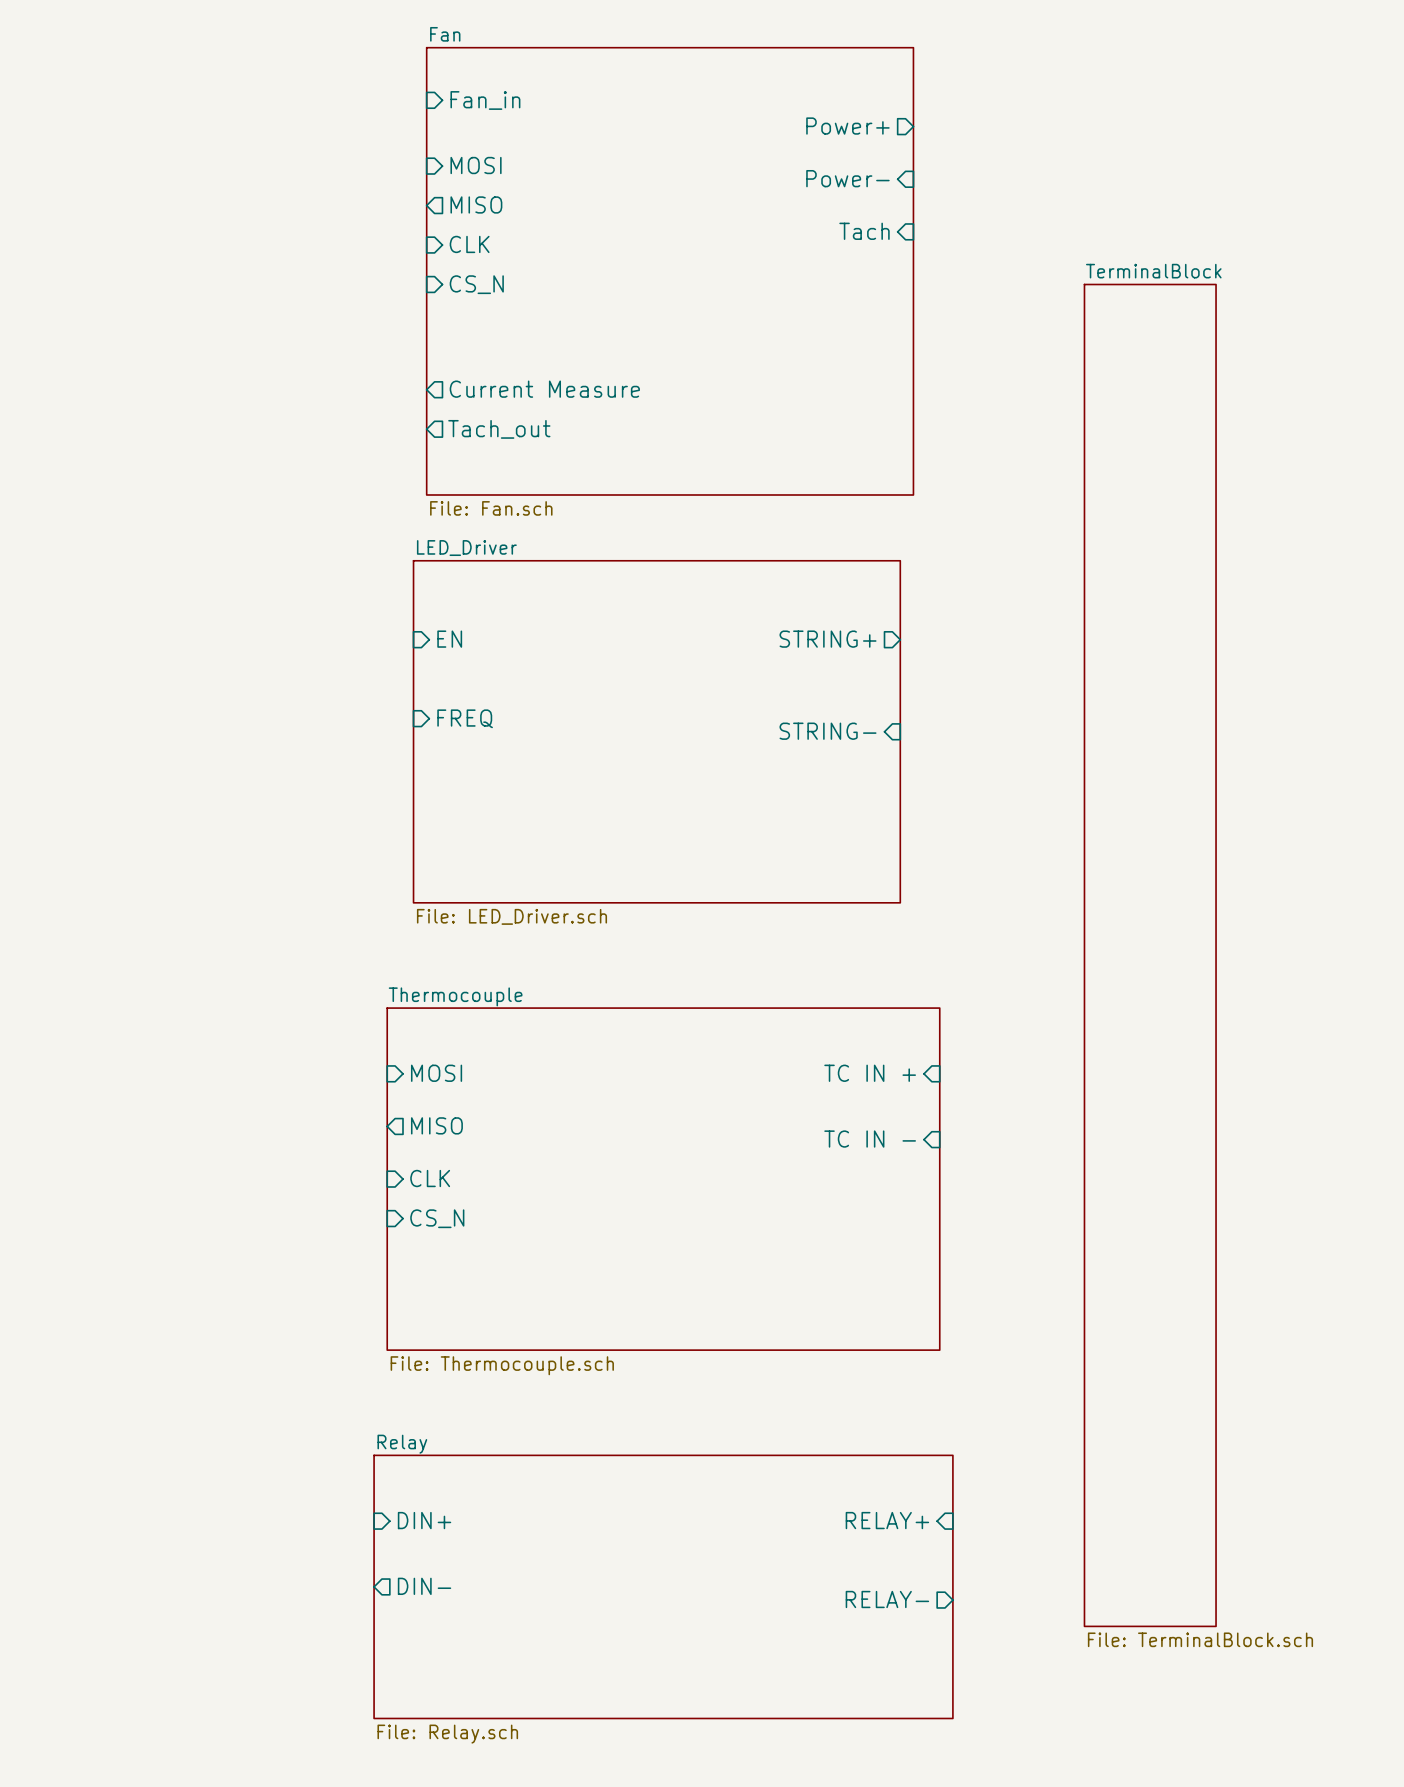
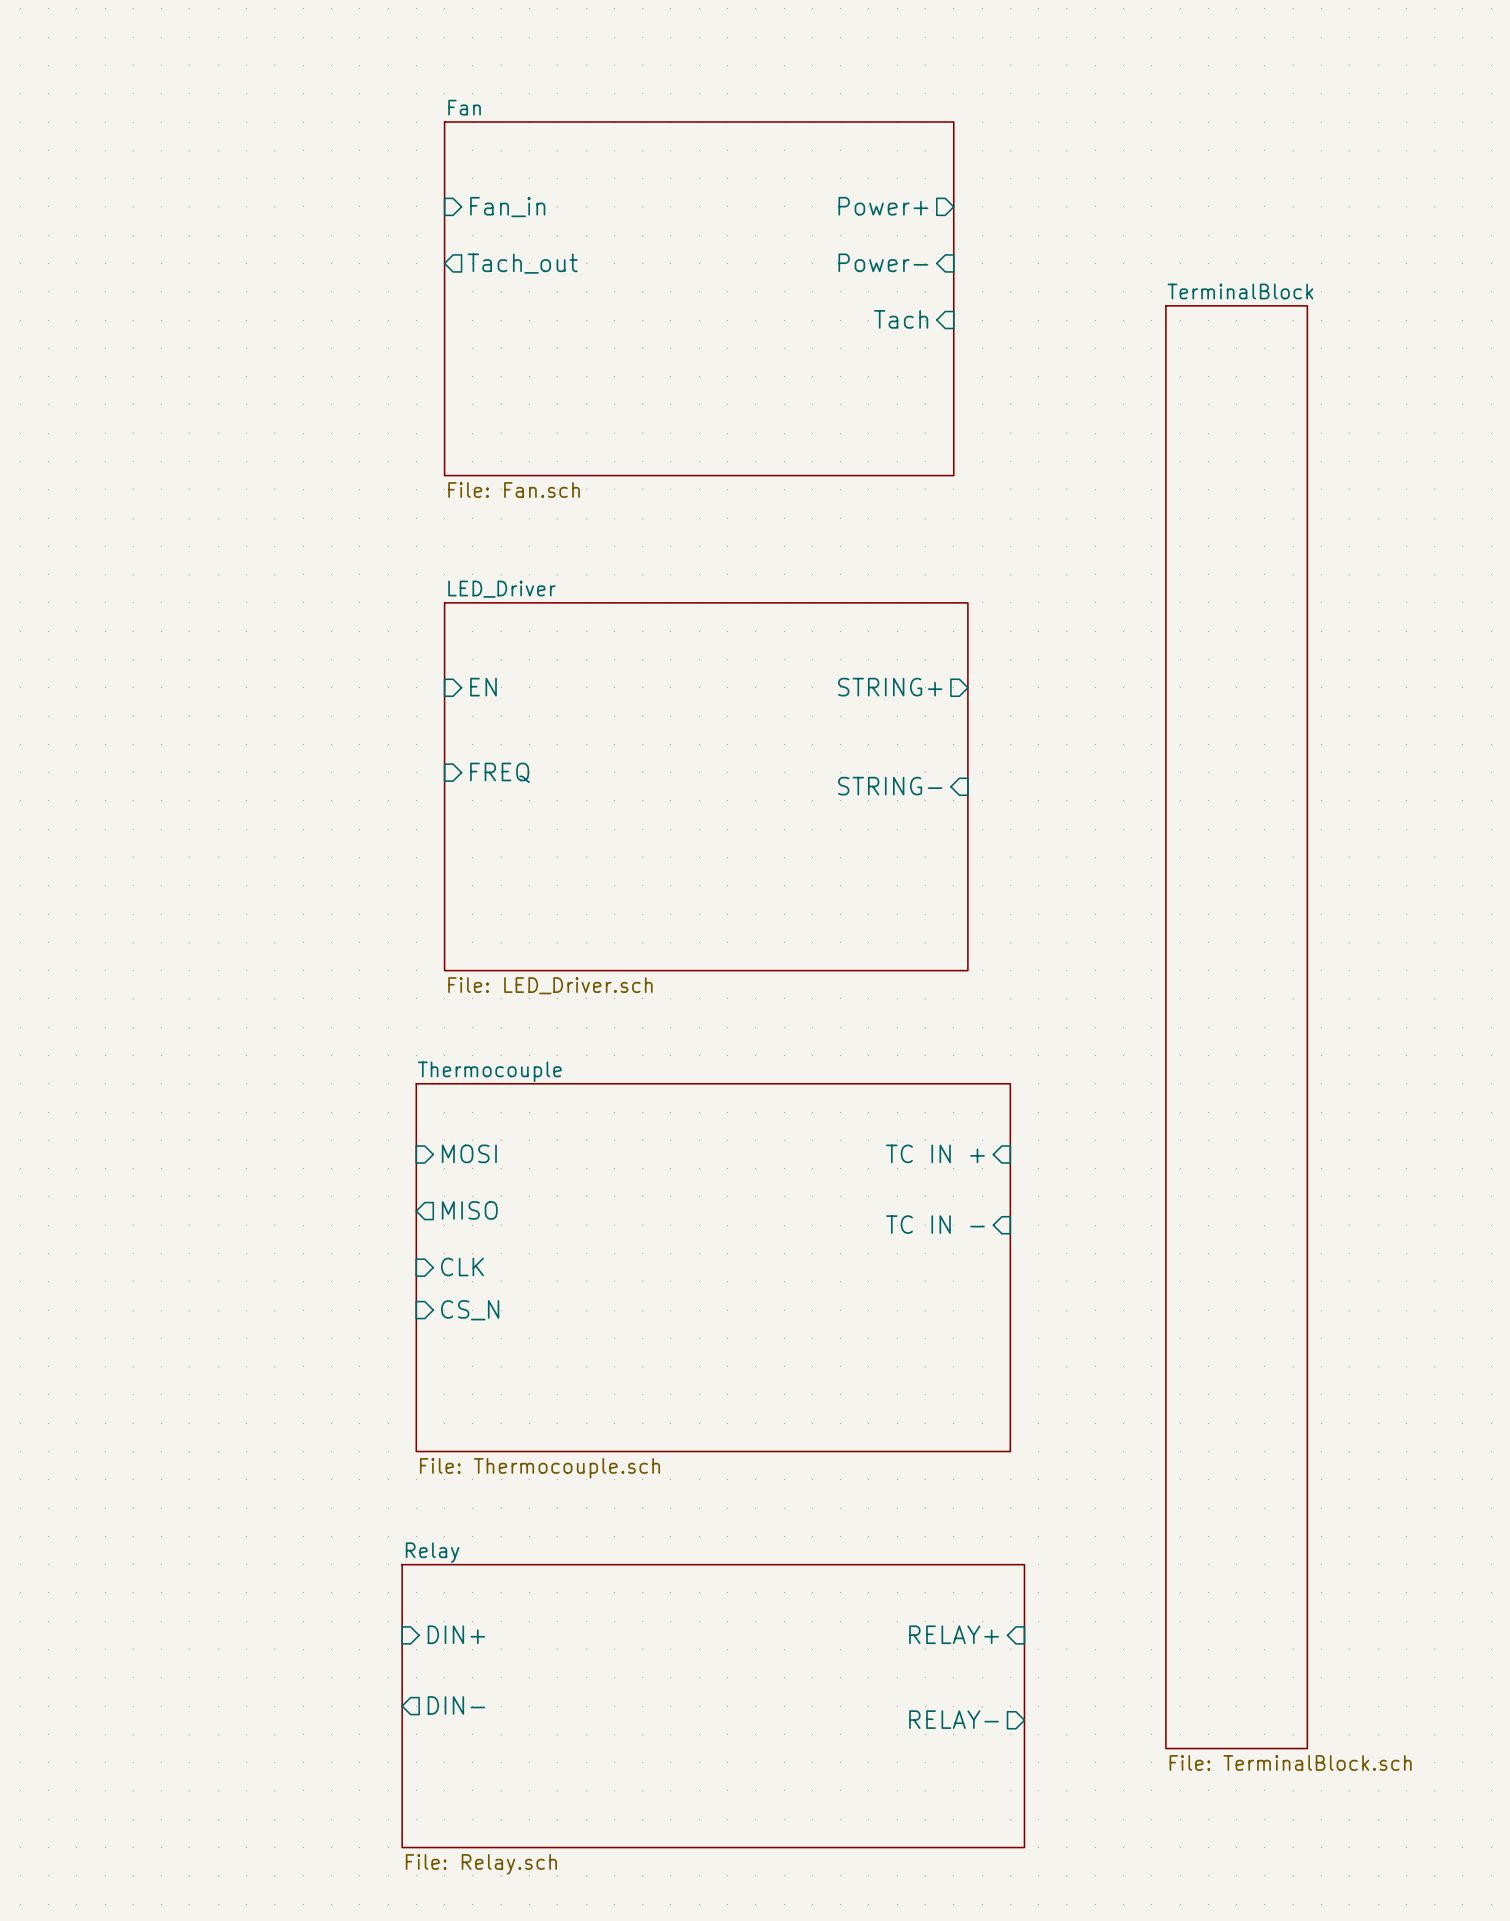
sheet pin position: Fan_in (485, 100) -> Fan_in (507, 207)
sheet pin position: Power+ (847, 126) -> Power+ (883, 206)
sheet pin: MOSI (476, 165) -> none
sheet pin position: Power- (847, 178) -> Power- (883, 262)
sheet pin: MISO (476, 204) -> none
sheet pin position: Tach (864, 231) -> Tach (901, 319)
sheet pin: CLK (469, 244) -> none
sheet Fan: File: Fan.sch (670, 271) -> none
sheet Fan: none -> File: Fan.sch (699, 298)
sheet pin: CS_N (476, 284) -> none
sheet pin: Current Measure (544, 389) -> none
sheet pin position: Tach_out (499, 429) -> Tach_out (522, 263)

